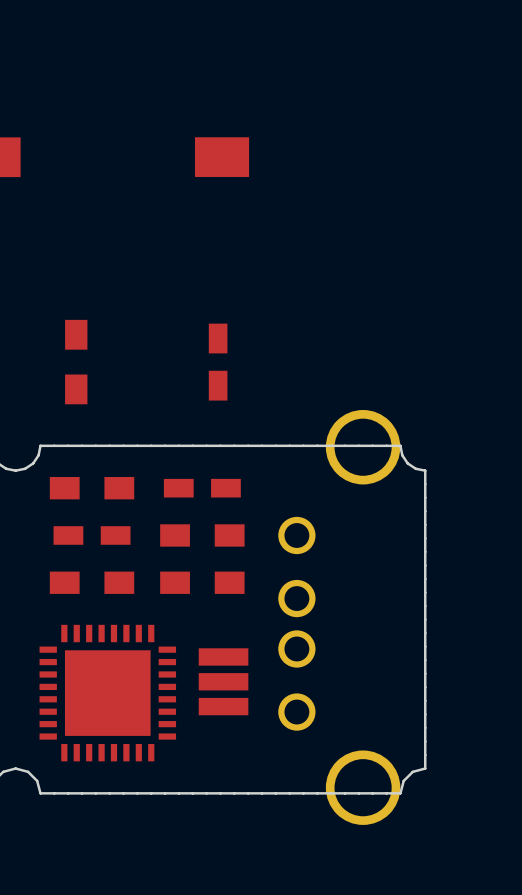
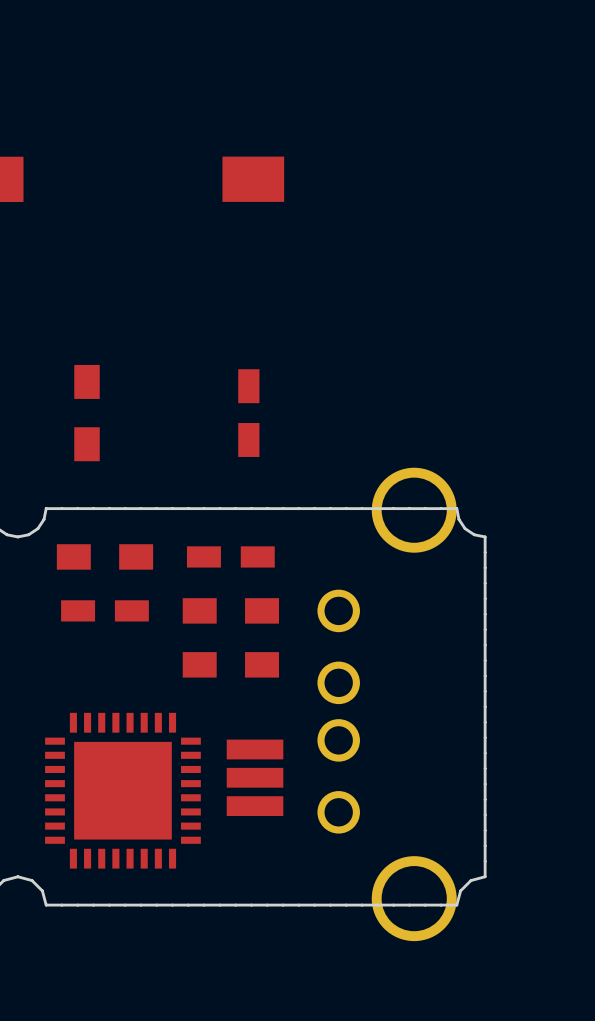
part: (92, 582) -> none

